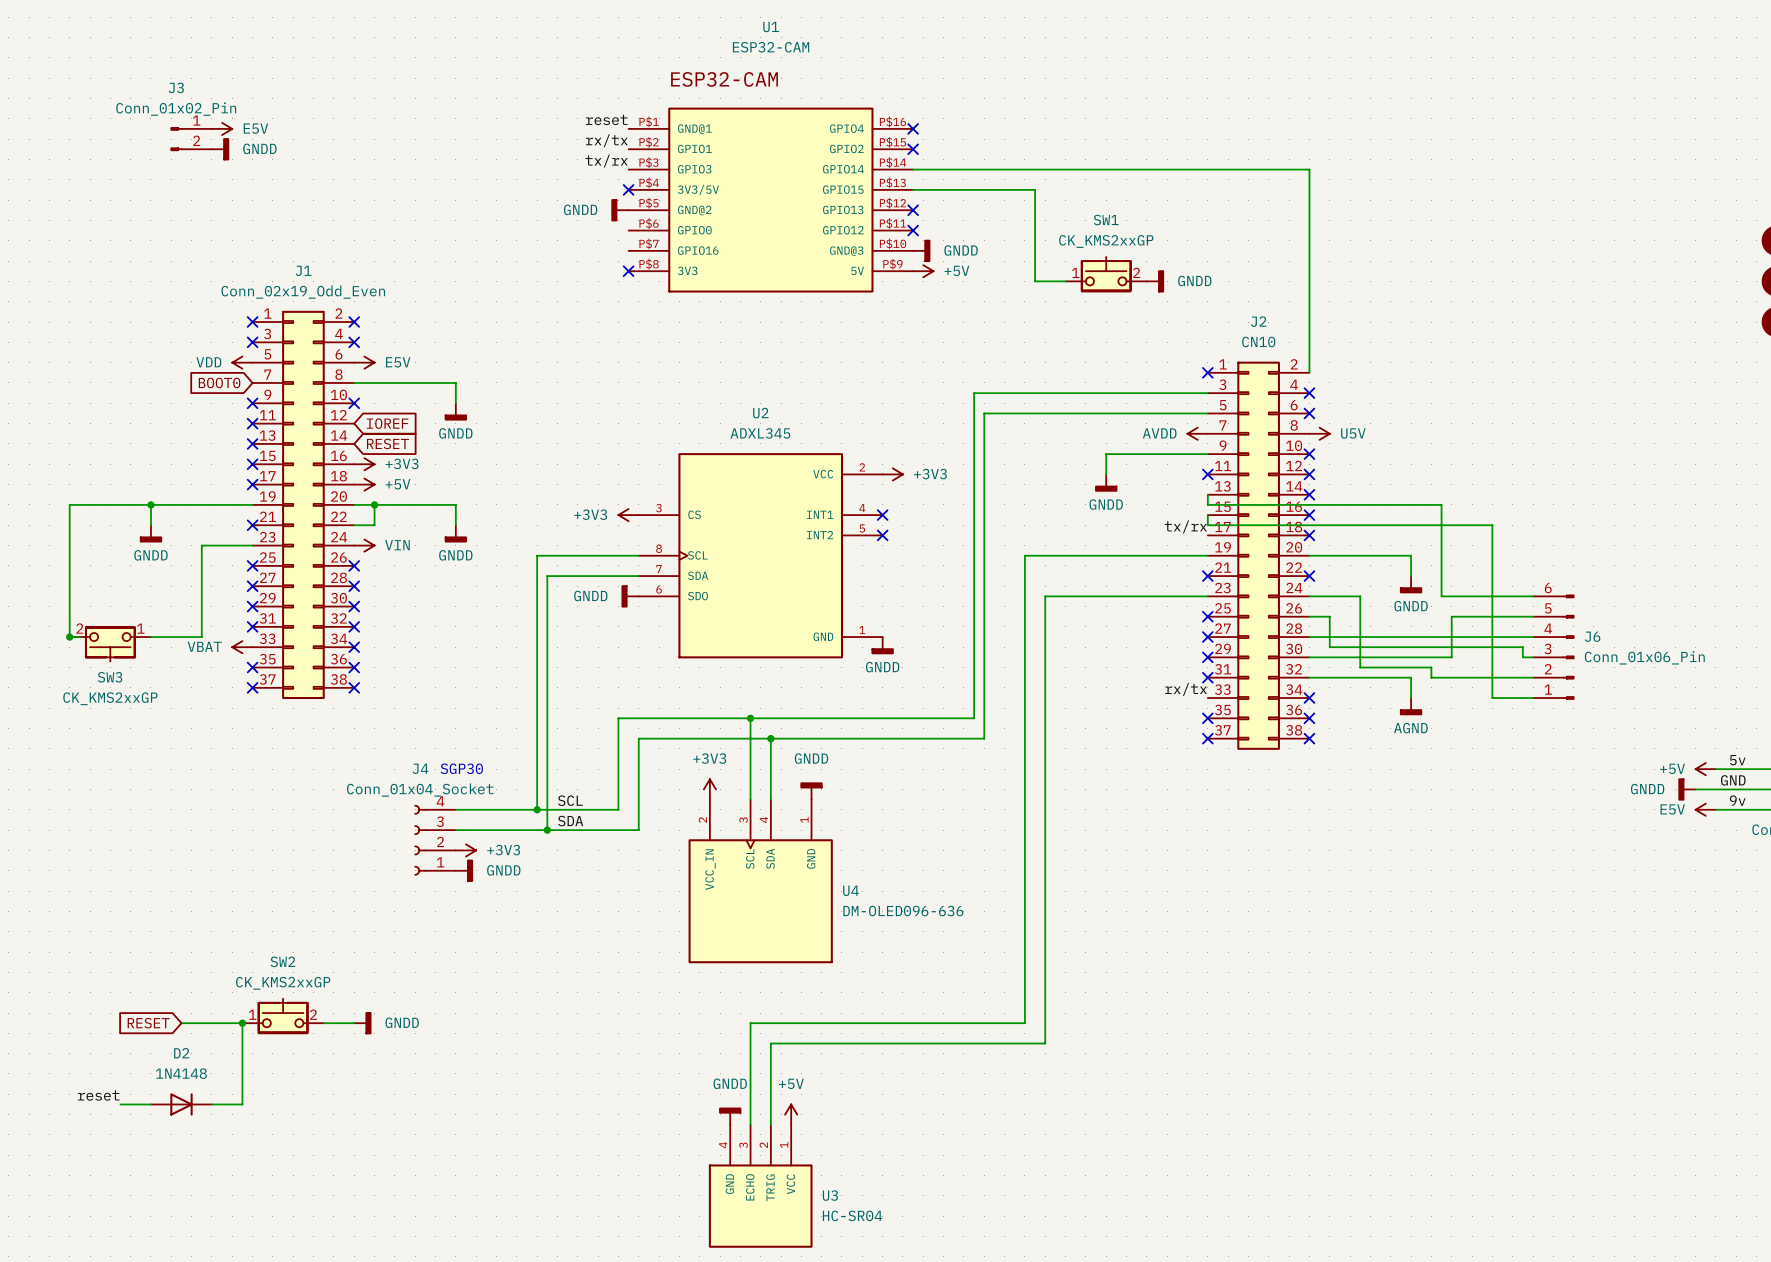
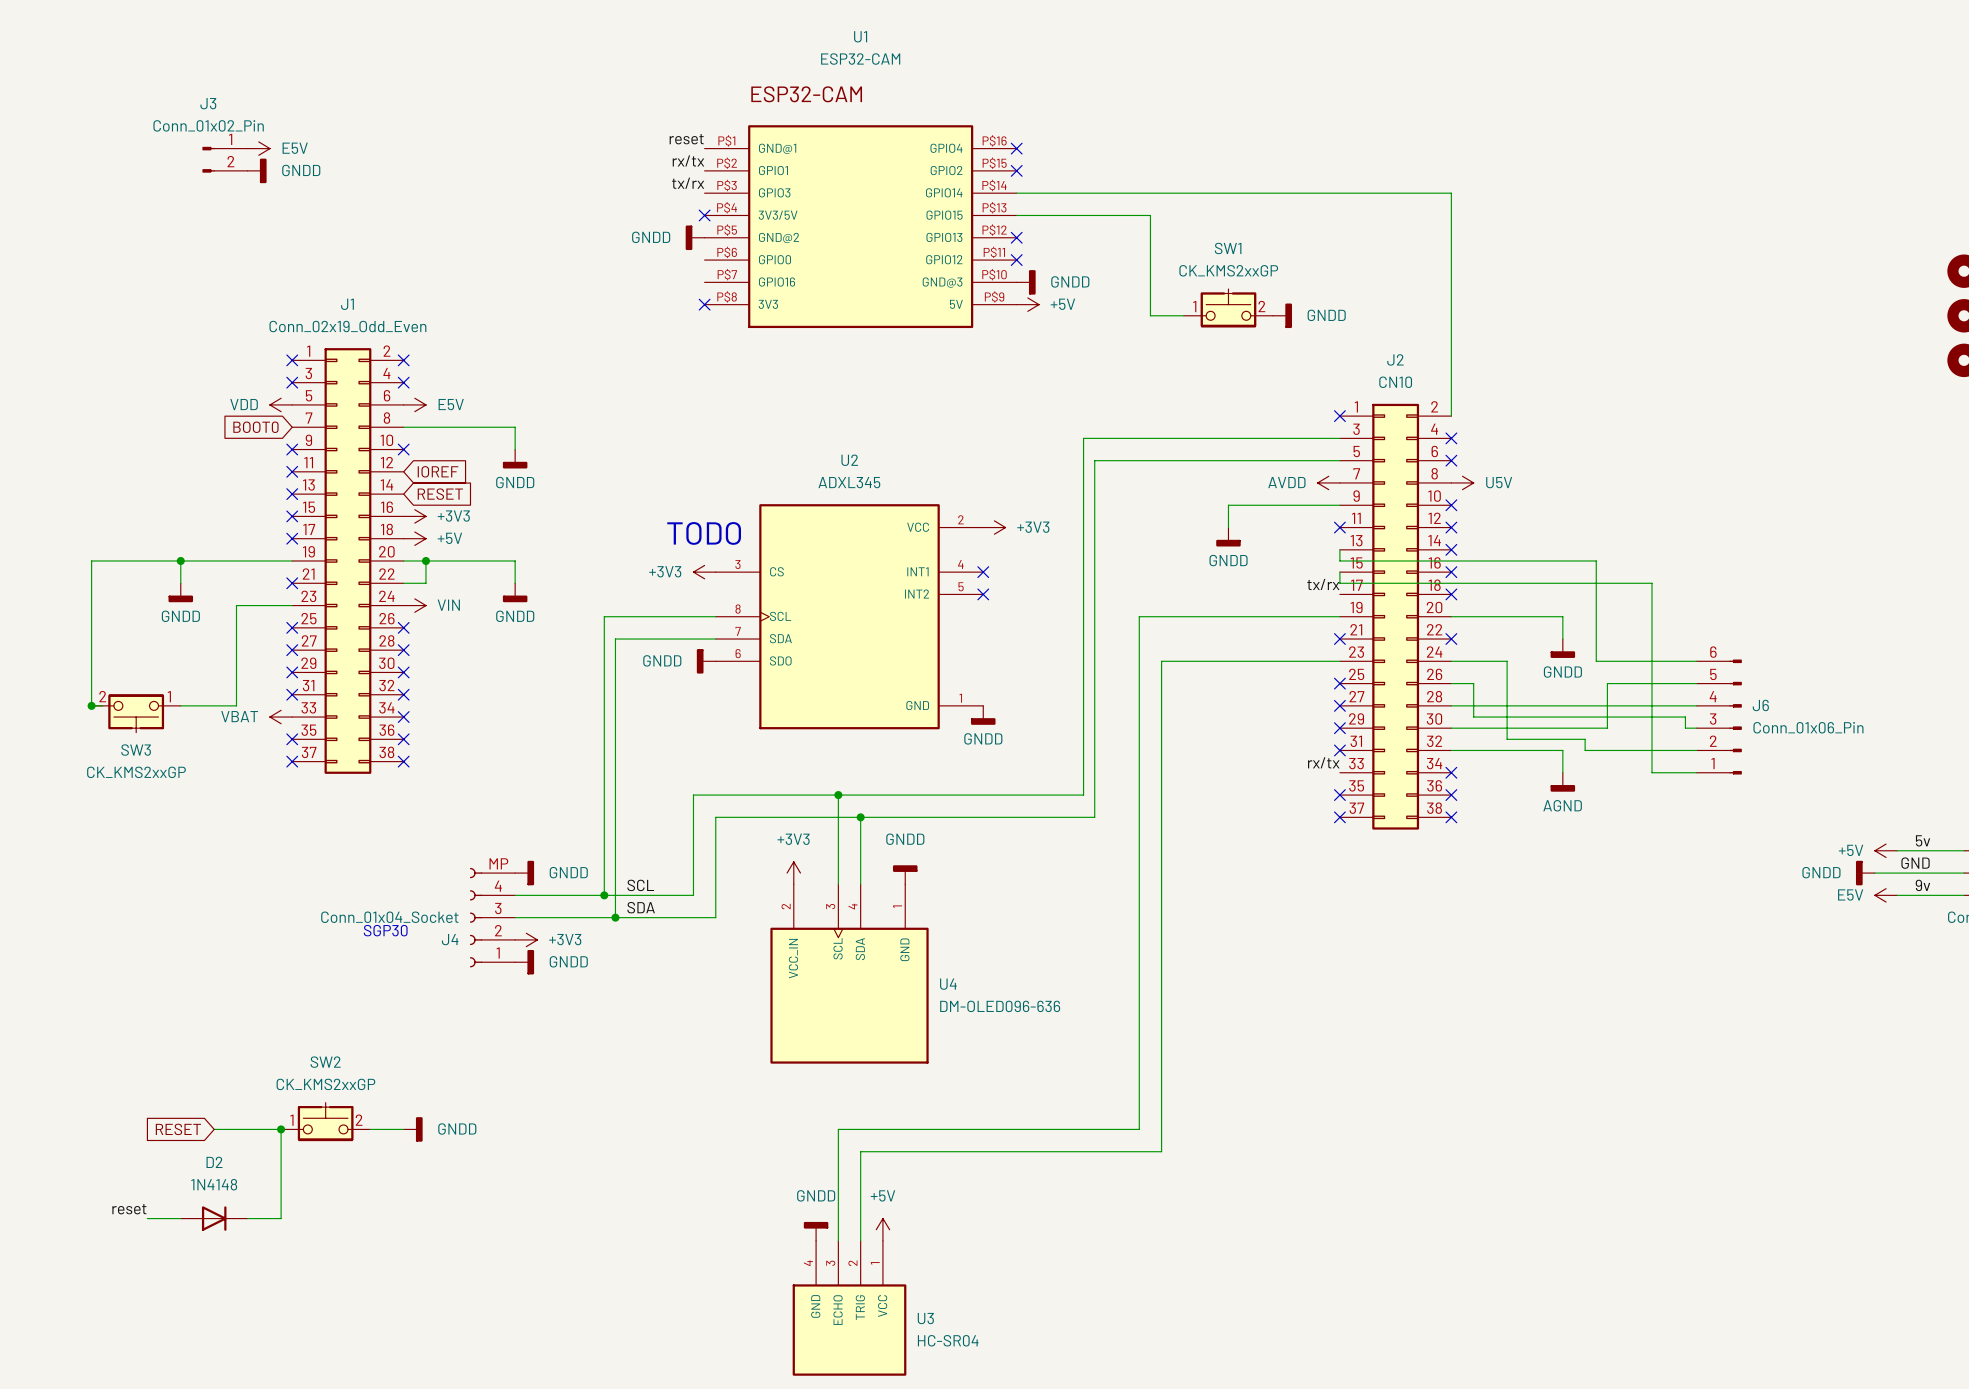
text: none -> TODO (704, 533)
J4 name position: J4 (420, 768) -> J4 (450, 939)
text position: SGP30 (461, 768) -> SGP30 (385, 930)
power symbol: none -> GNDD (524, 873)
J4 value position: Conn_01x04_Socket (420, 790) -> Conn_01x04_Socket (389, 917)
J4 symbol: [414, 805, 456, 876] -> [469, 867, 516, 968]

